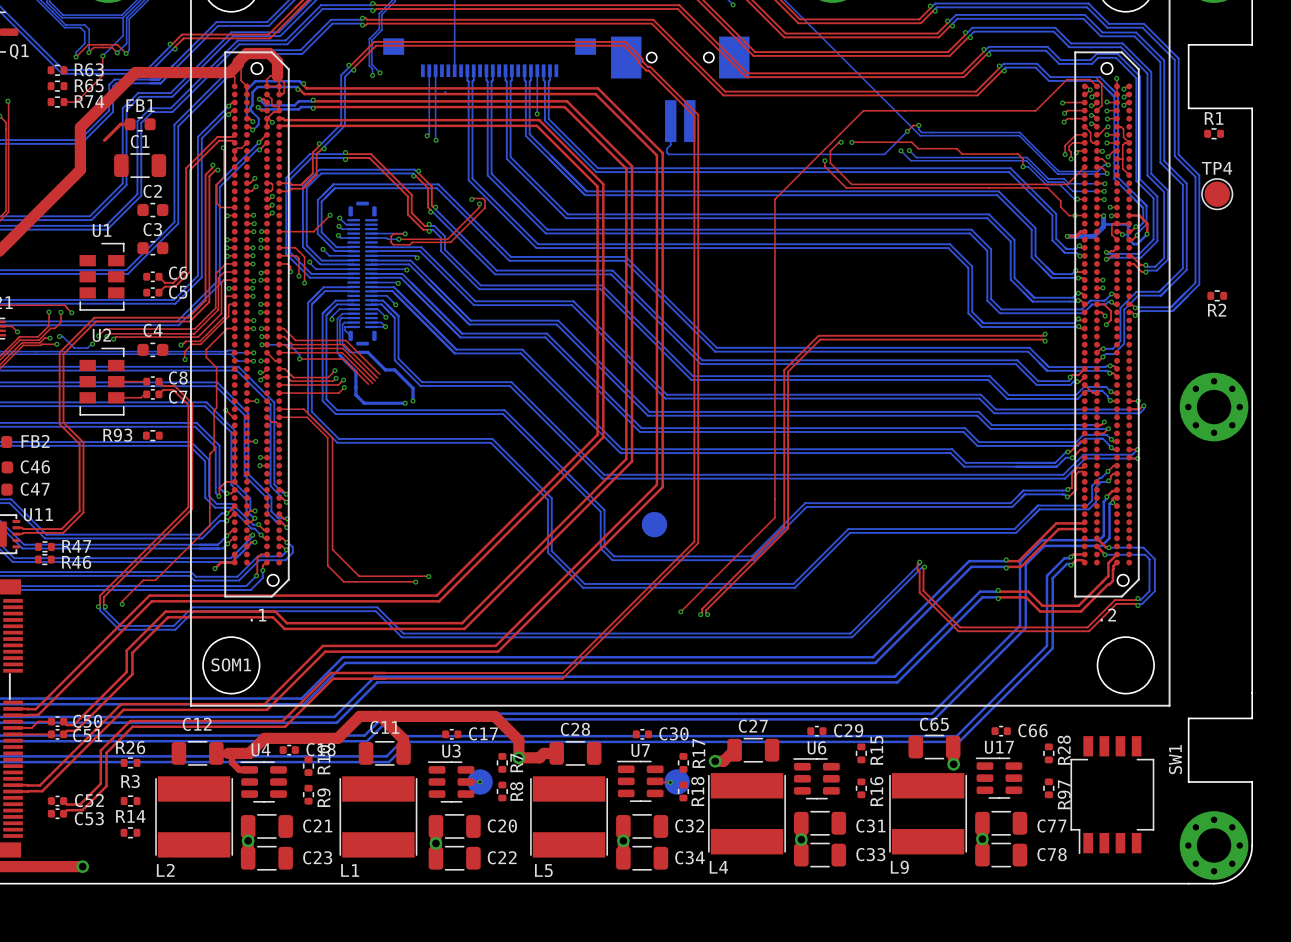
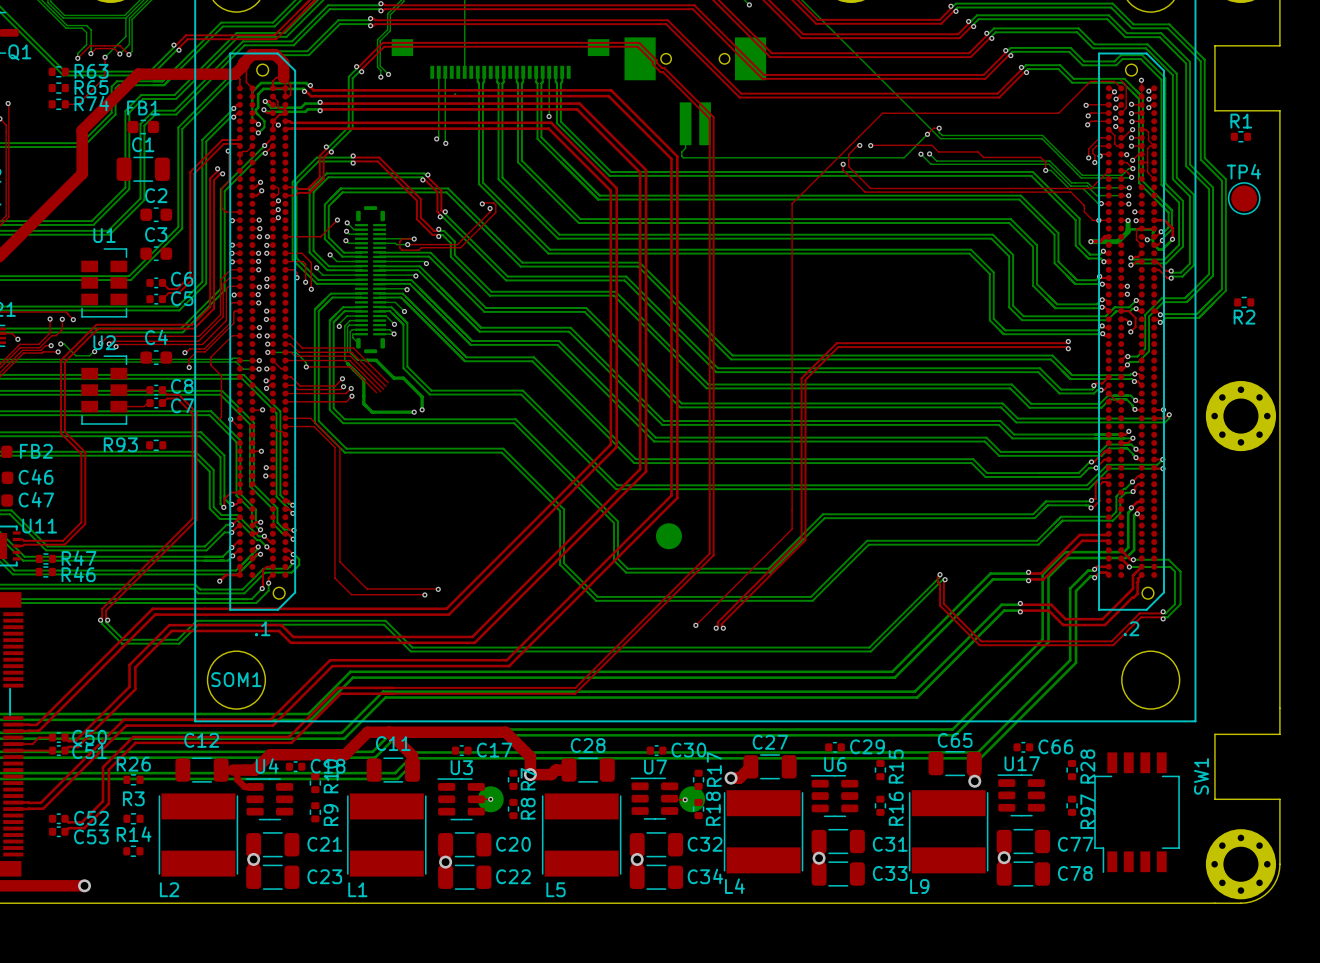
top track: (130, 124) (120, 124) (104, 140) -> none
top track: (214, 410) (214, 449) (209, 454) (209, 525) (155, 580) (143, 580) (122, 601) (122, 604) -> none
via: (122, 604) -> none

